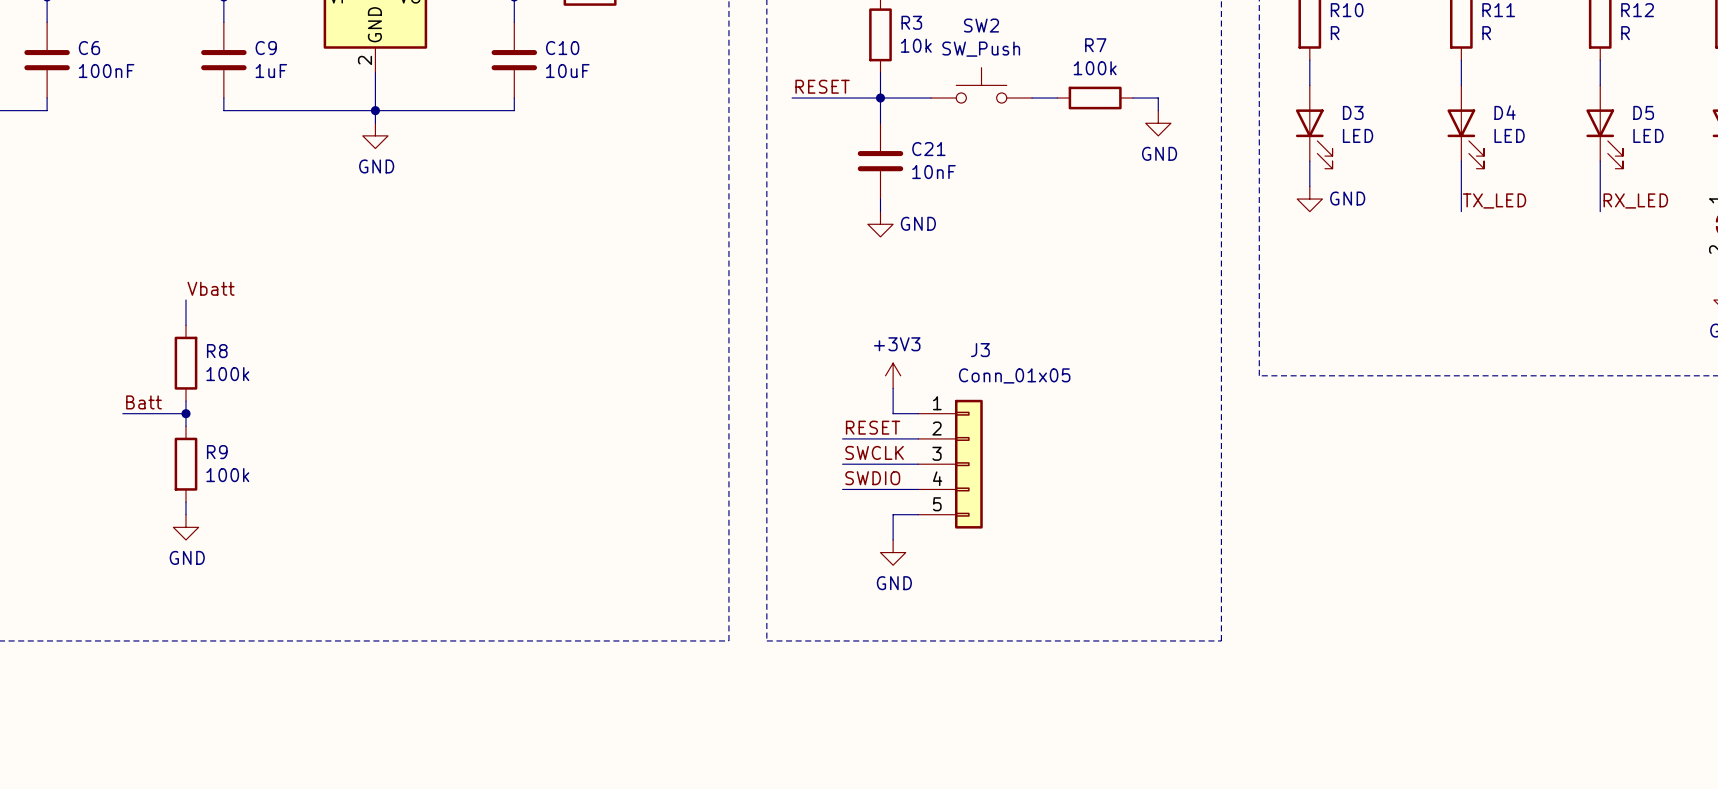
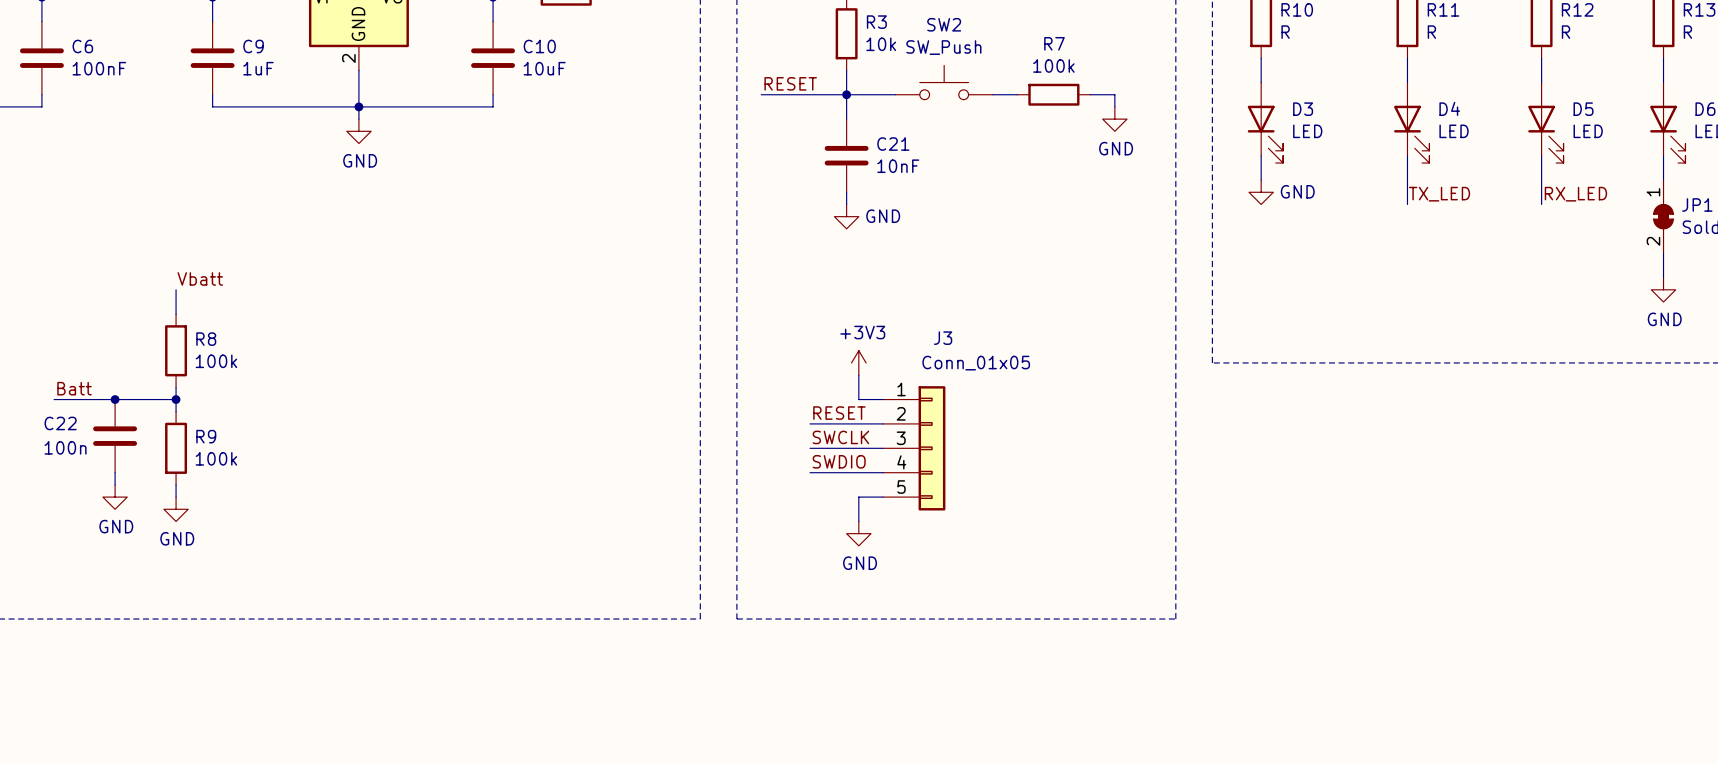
label position: Batt (143, 402) -> Batt (74, 388)
wire: none -> (54, 399) (115, 399)
junction: none -> (115, 399)
C22: none -> 100n (115, 436)
wire: none -> (115, 472) (115, 484)
power symbol: none -> GND (115, 497)

